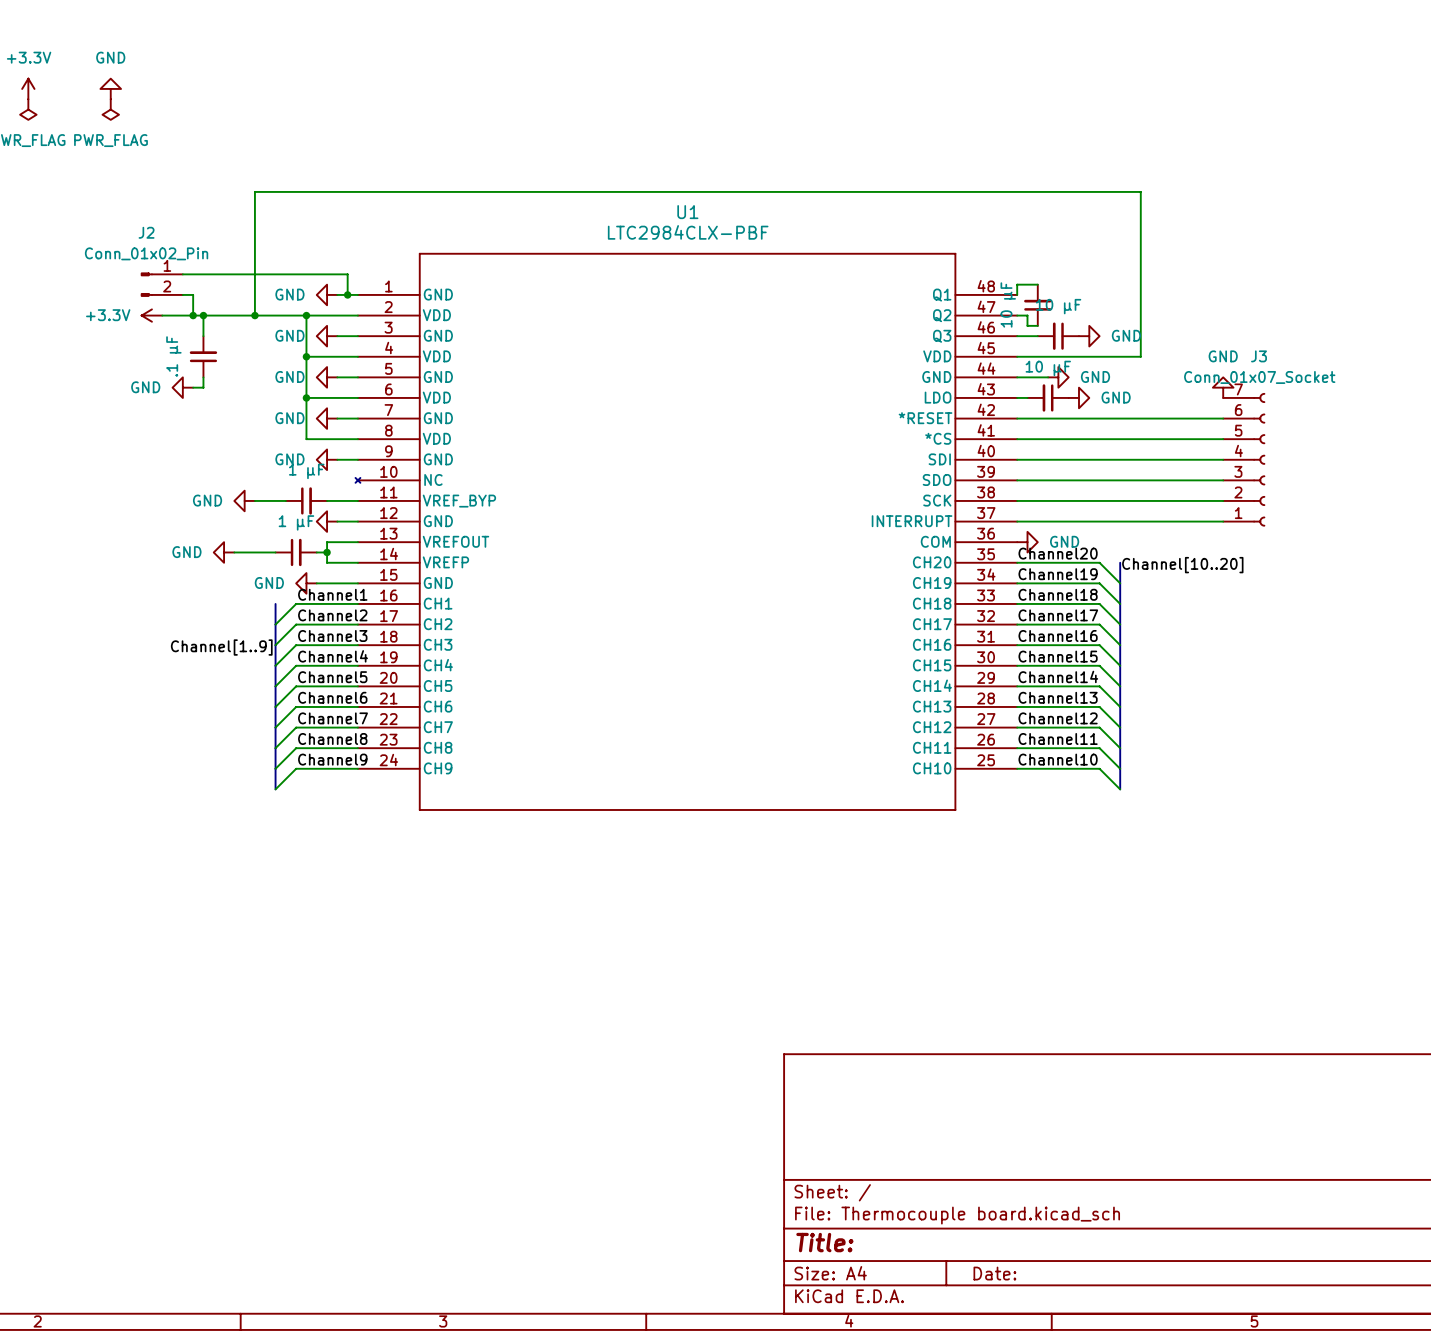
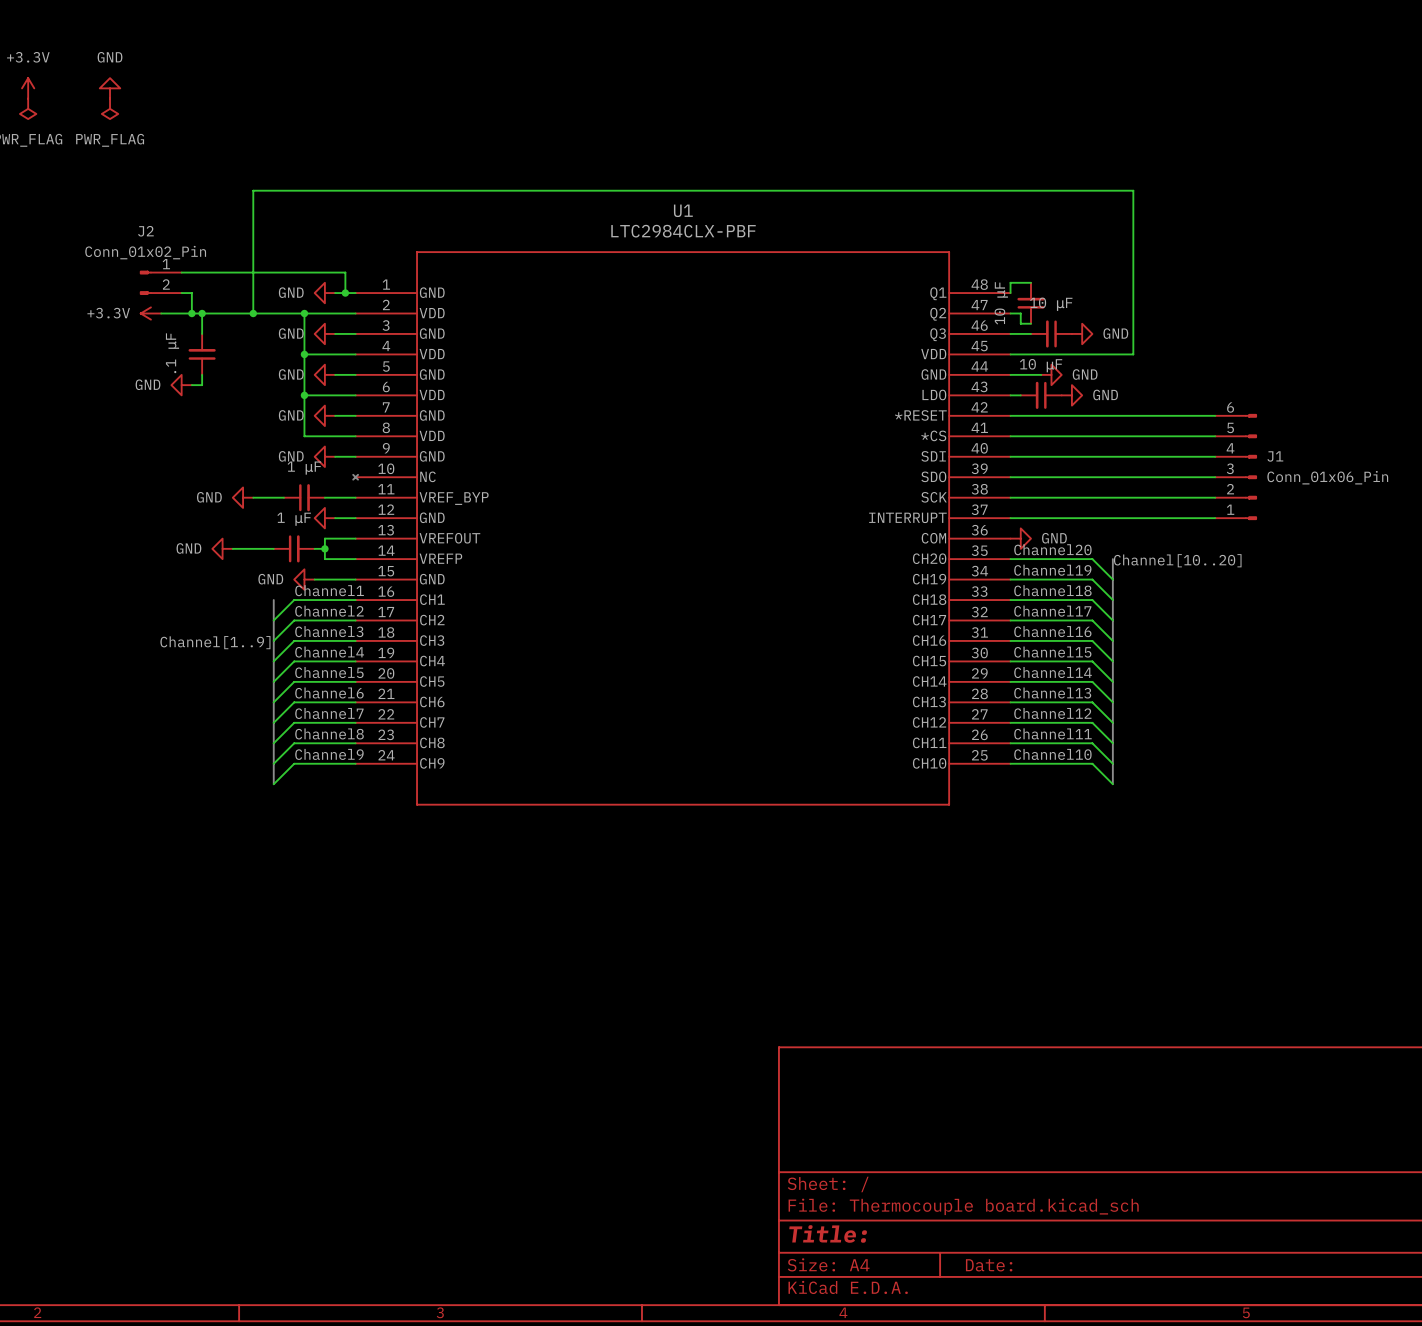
power symbol: GND (1223, 387) -> none
J3: Conn_01x07_Socket (1244, 459) -> none
J1: none -> Conn_01x06_Pin (1235, 467)

